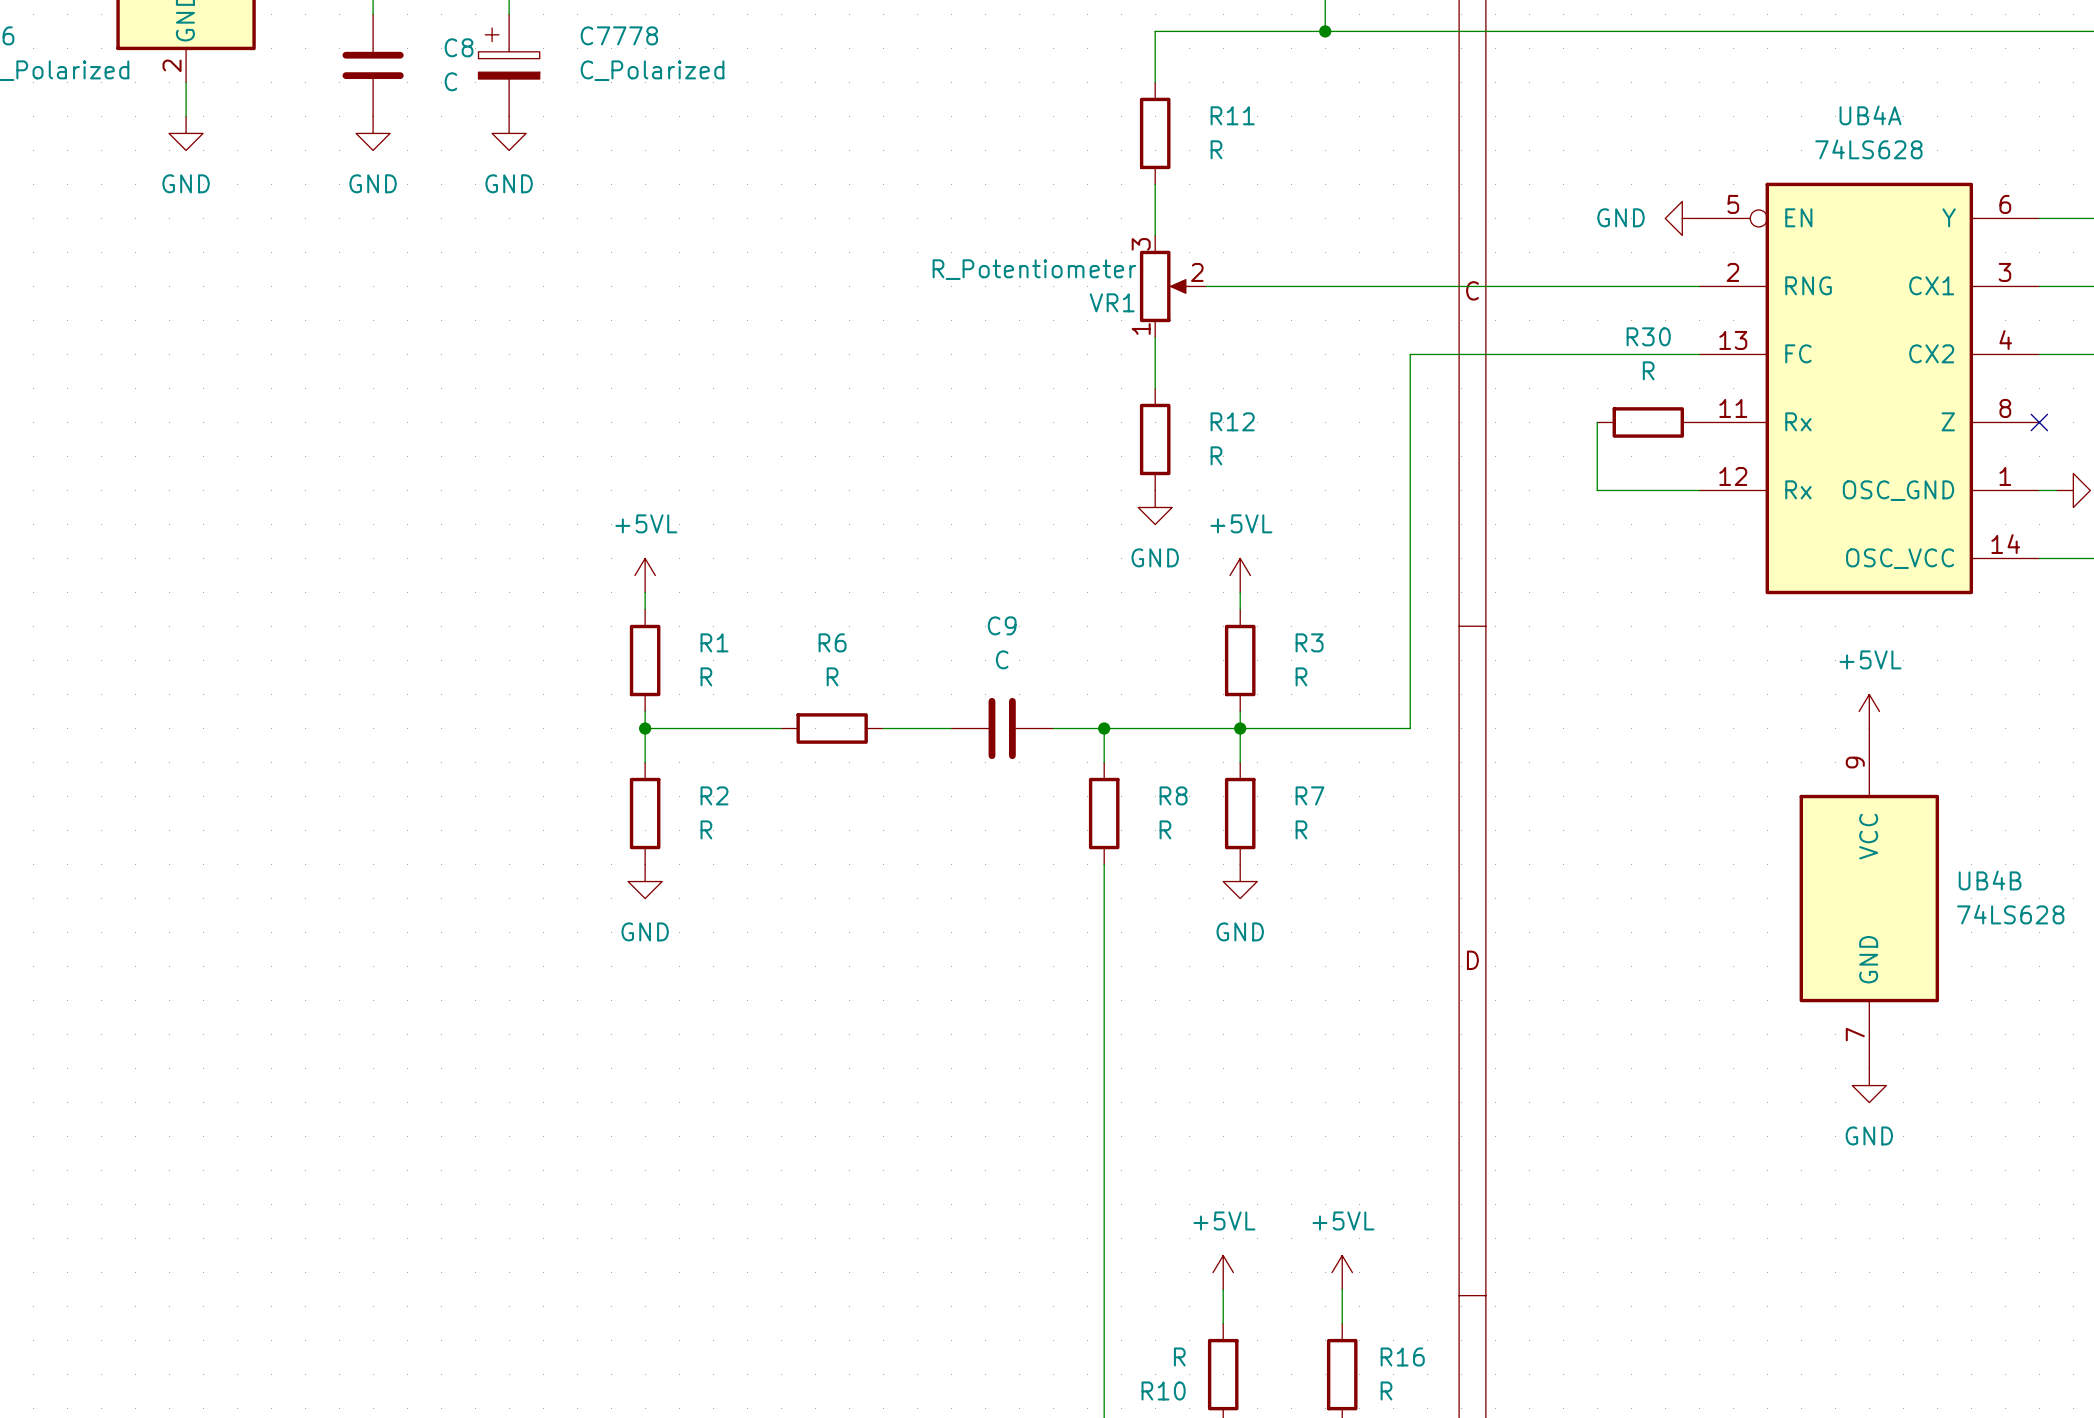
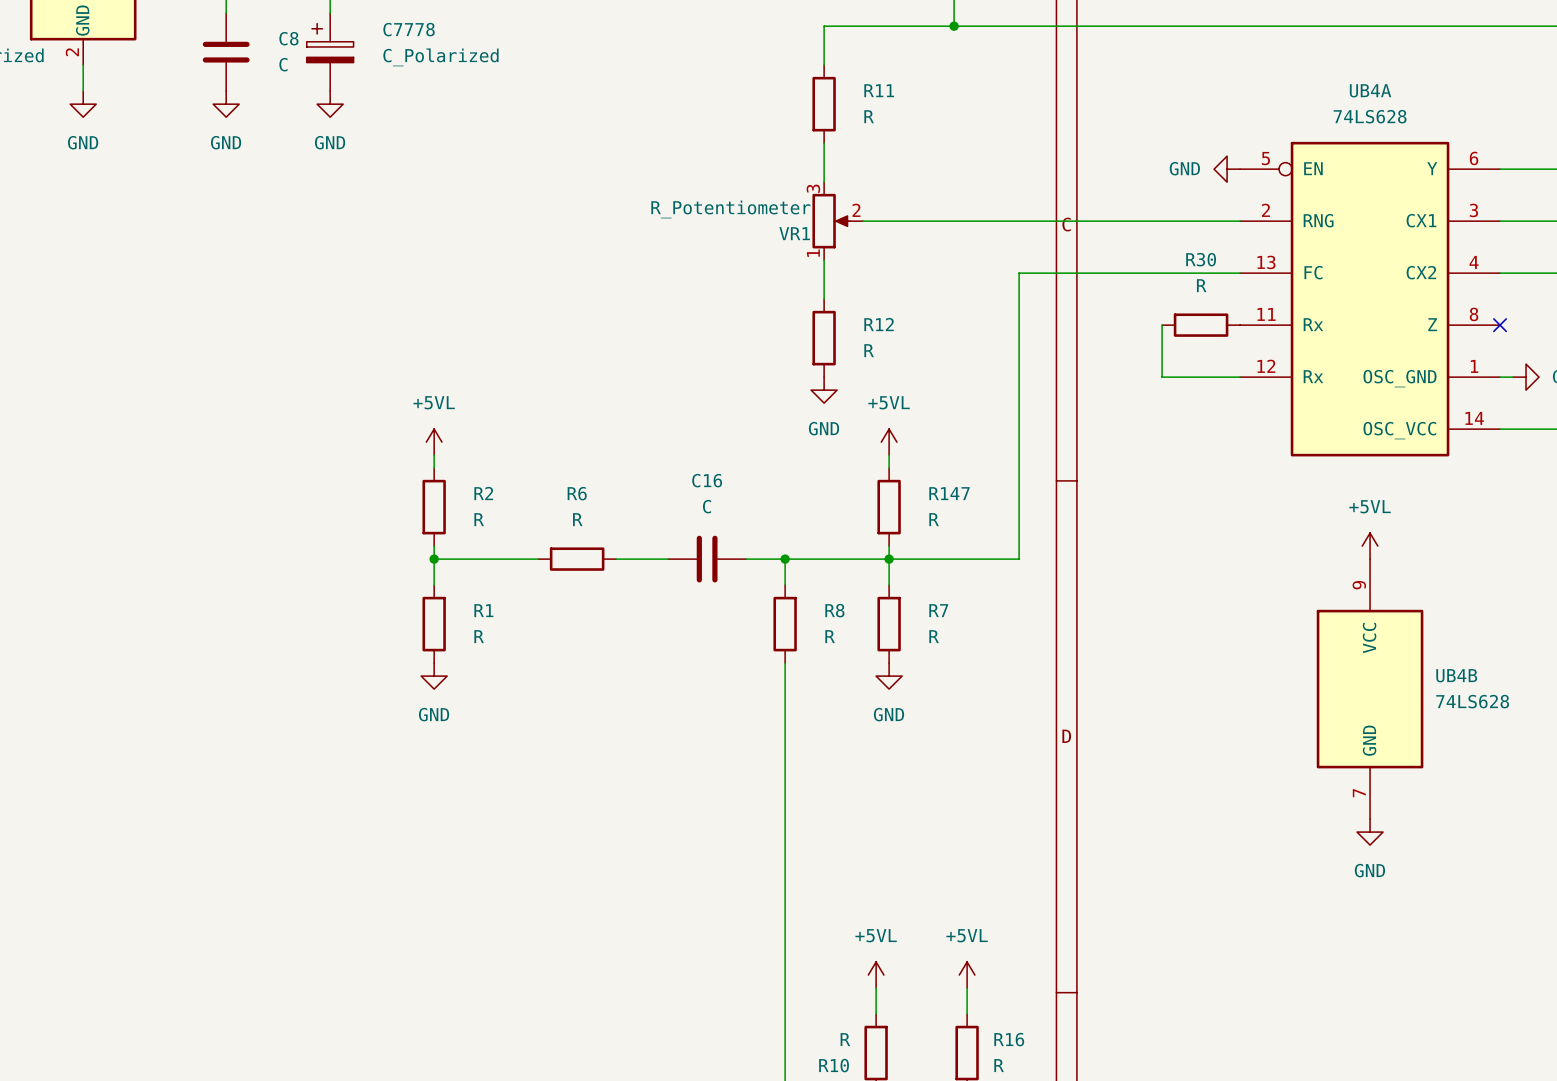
C9 name: C9 (1002, 625) -> C16 (707, 480)
R1 name: R1 (714, 642) -> R2 (483, 493)
R3 name: R3 (1309, 642) -> R147 (949, 493)
R2 name: R2 (714, 795) -> R1 (483, 610)

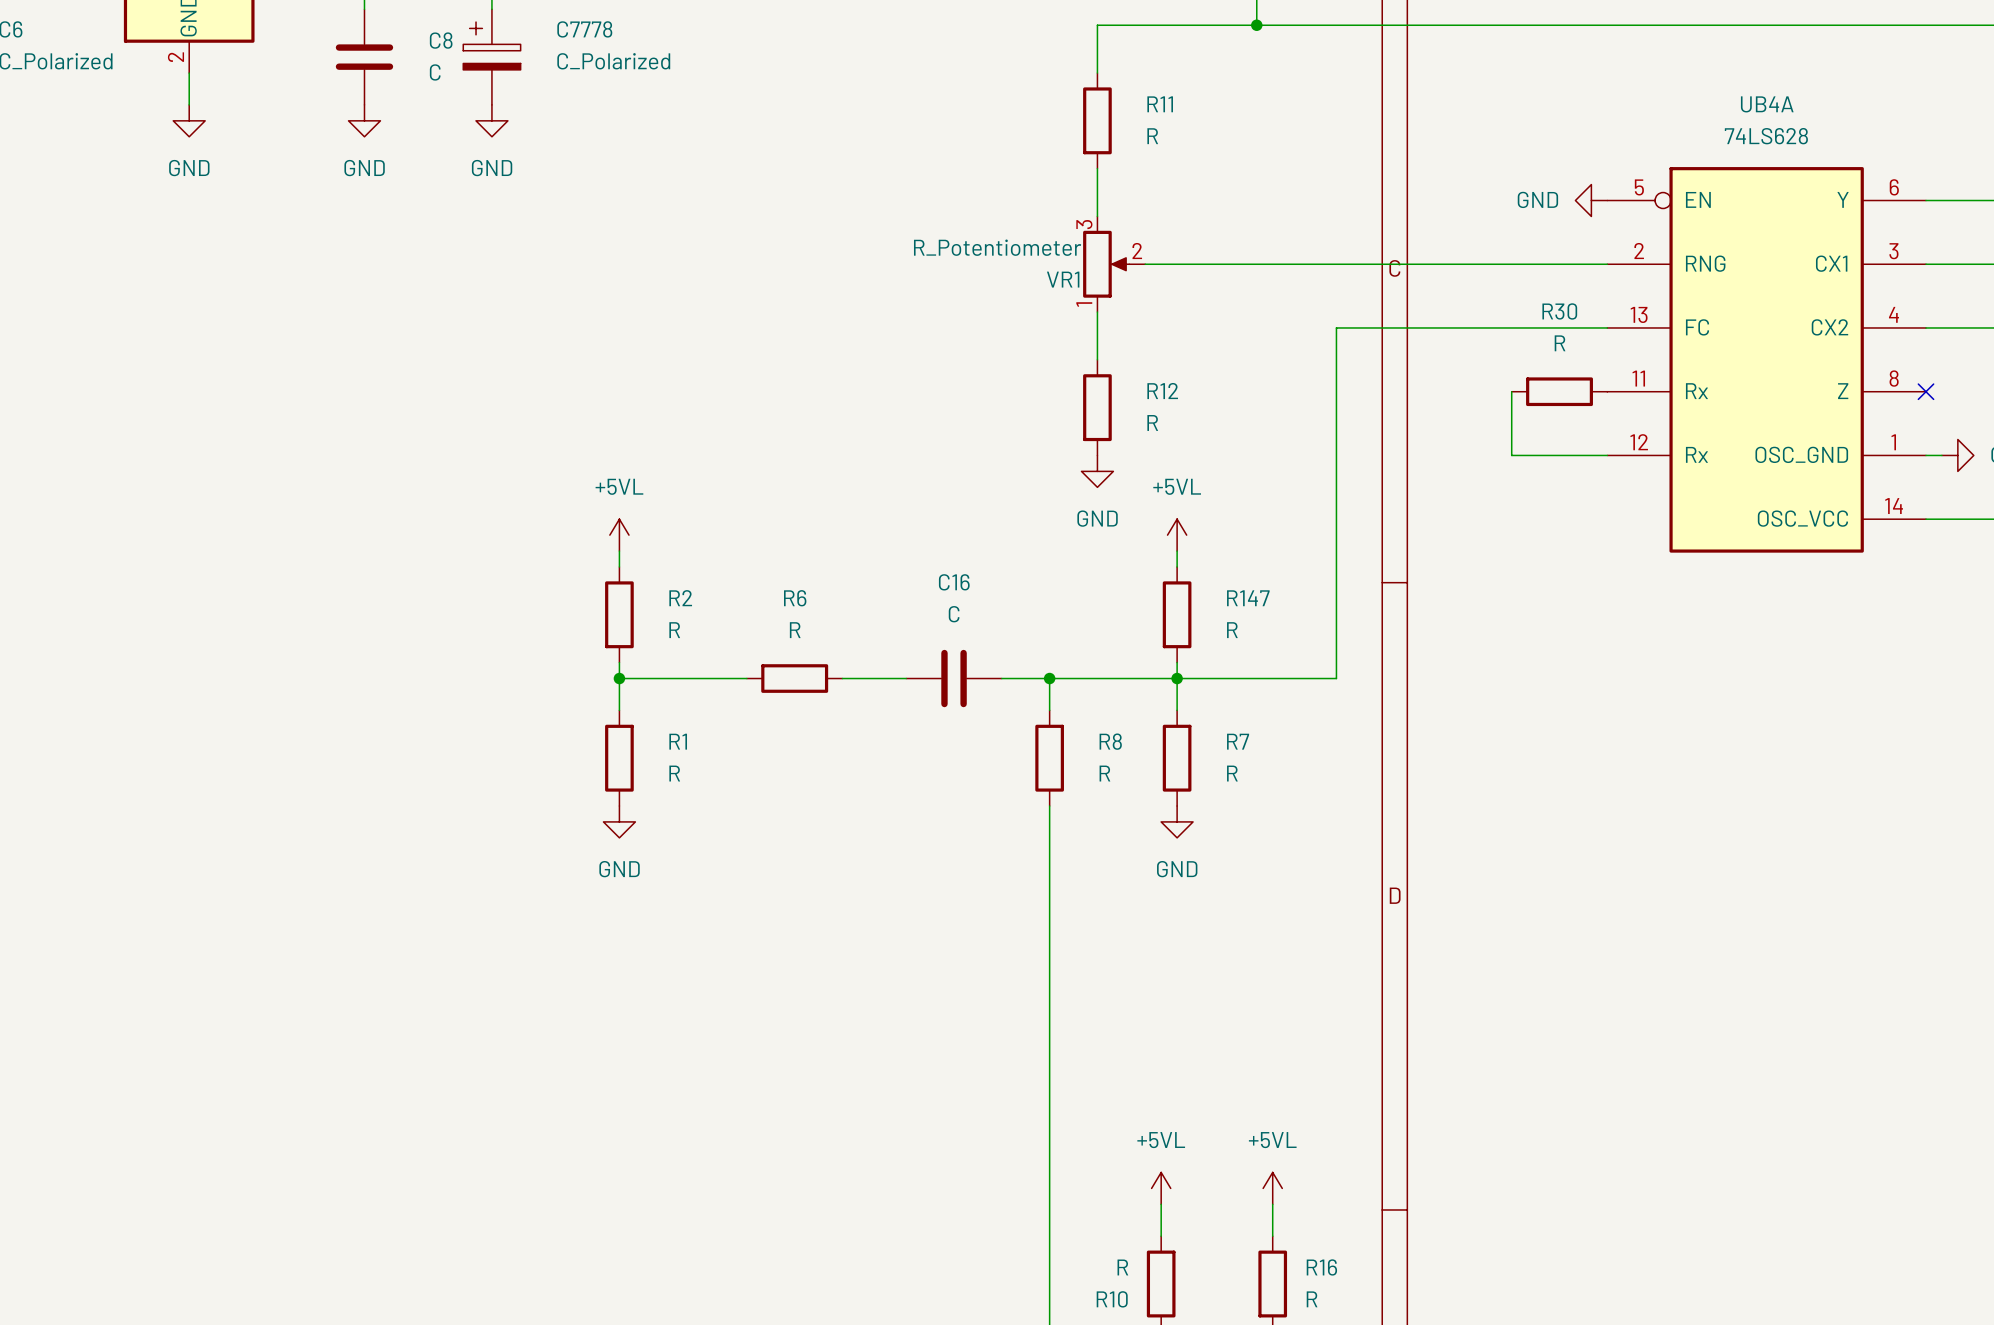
power symbol: +5VL (1370, 546) -> none
UB4B: 74LS628 (1370, 689) -> none
power symbol: GND (1370, 832) -> none

